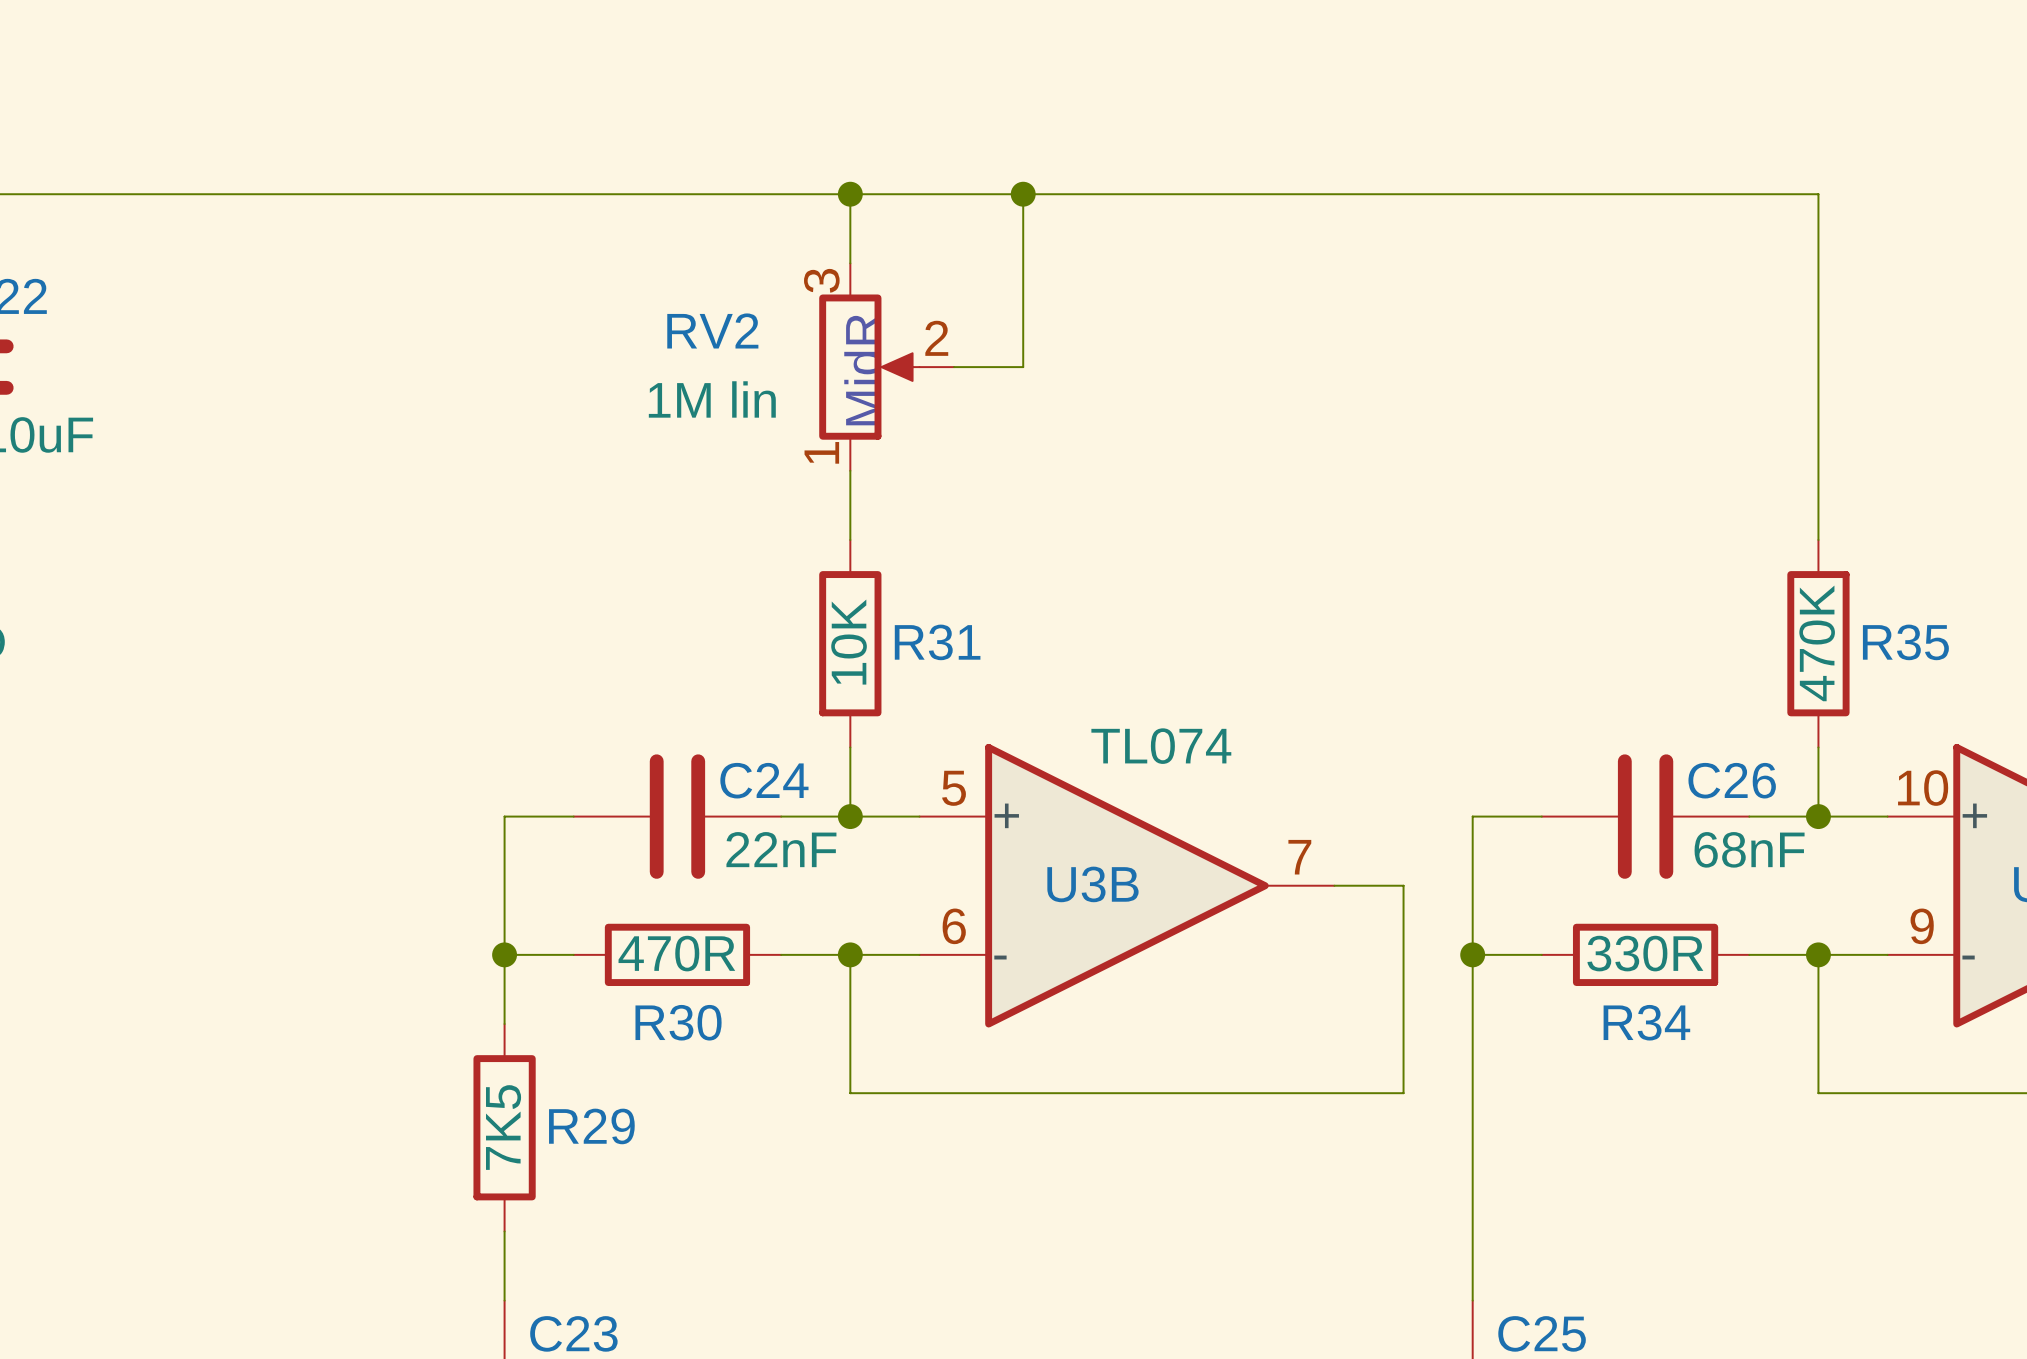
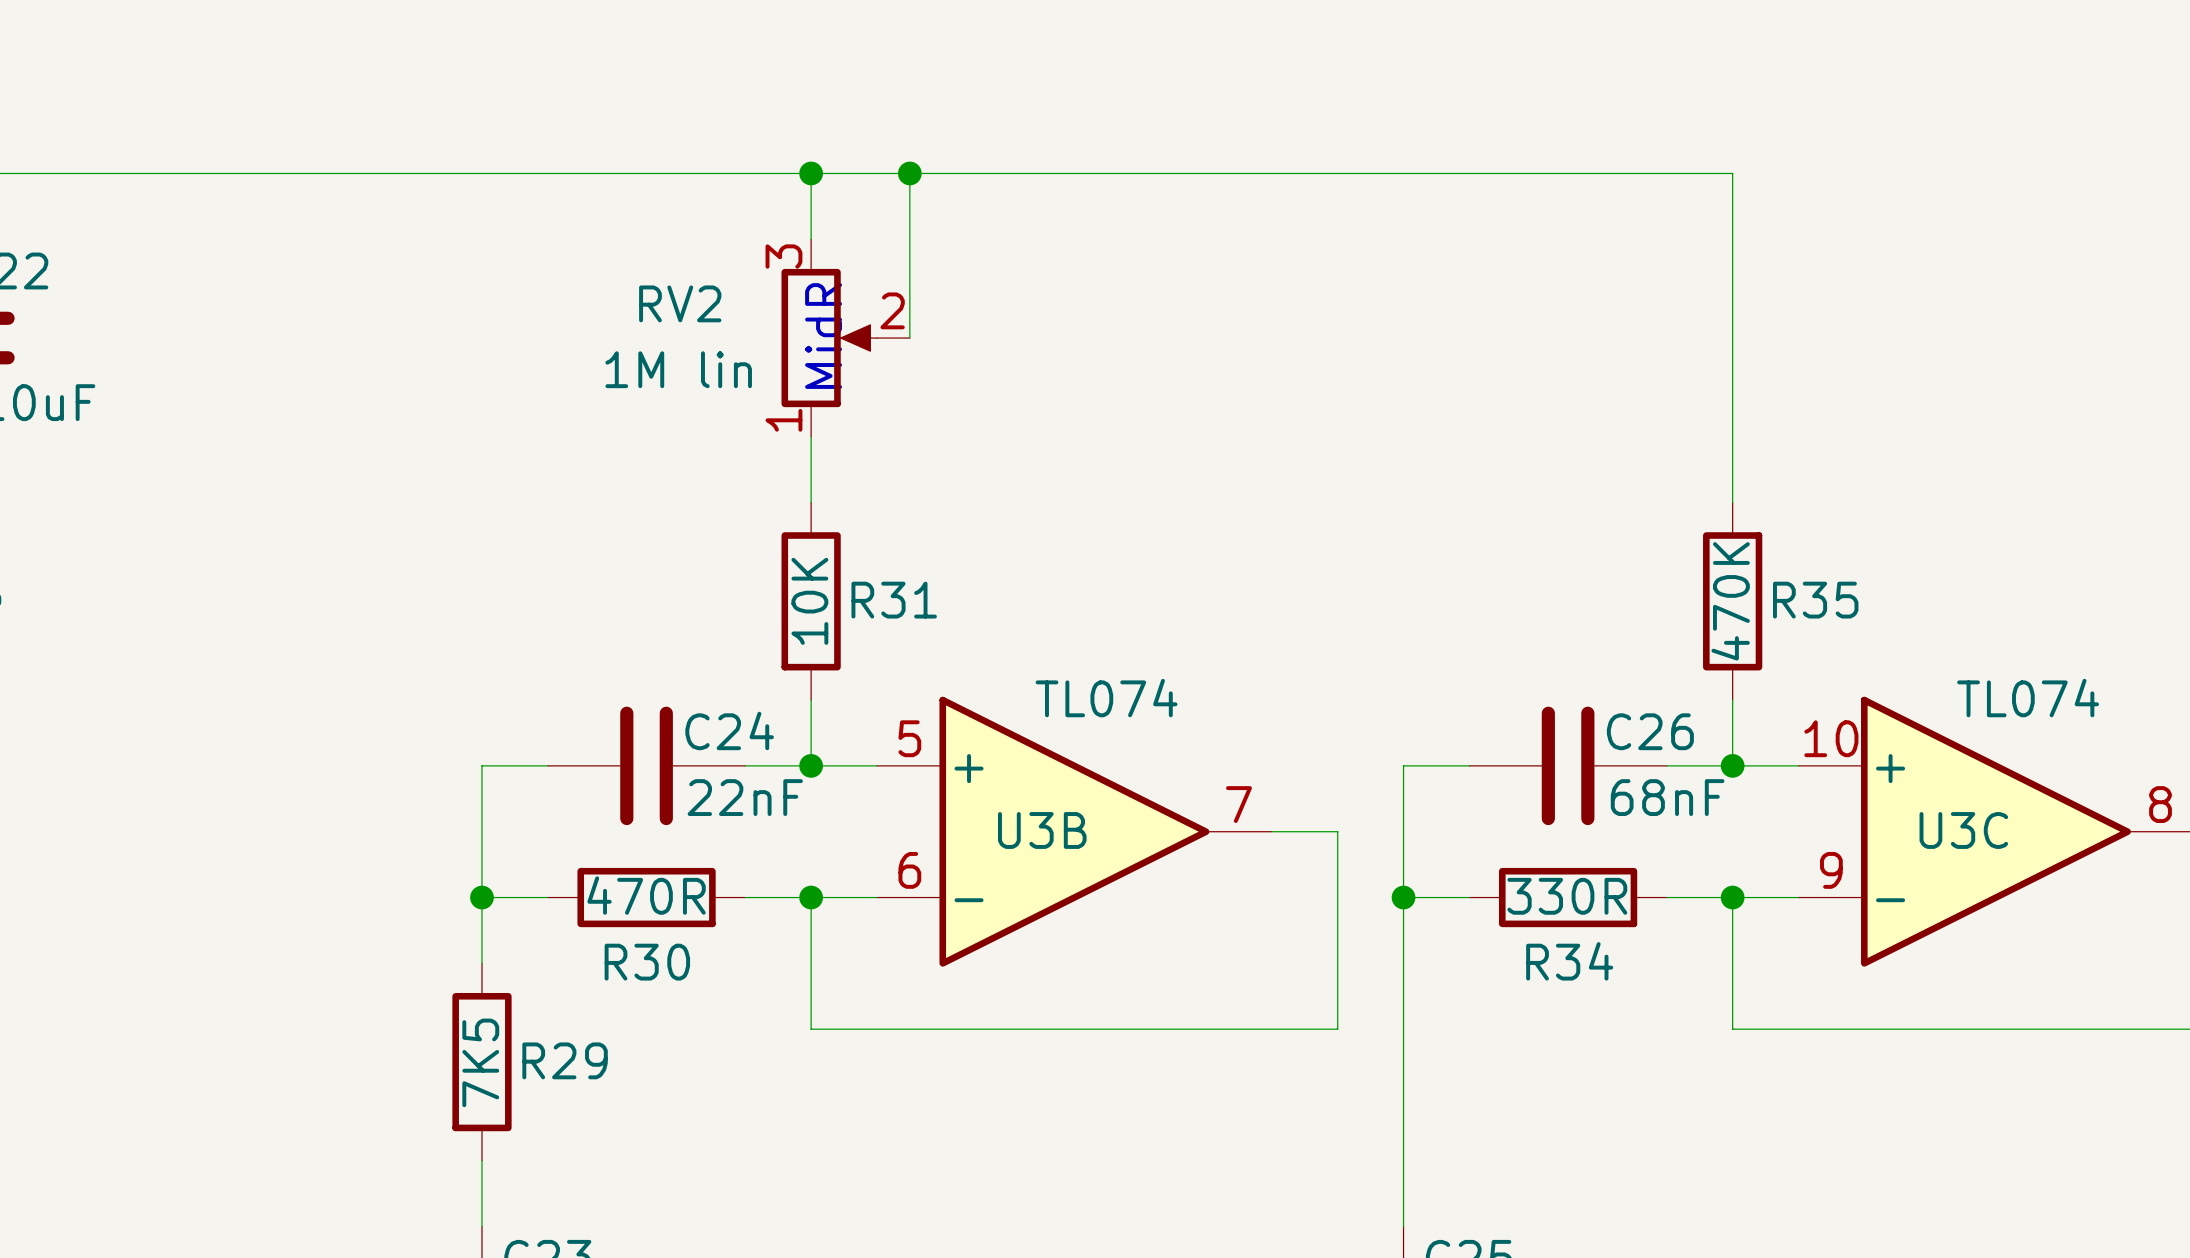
wire: (1023, 194) (1023, 367) (954, 367) -> (909, 173) (909, 338)
junction position: (1023, 194) -> (909, 173)

